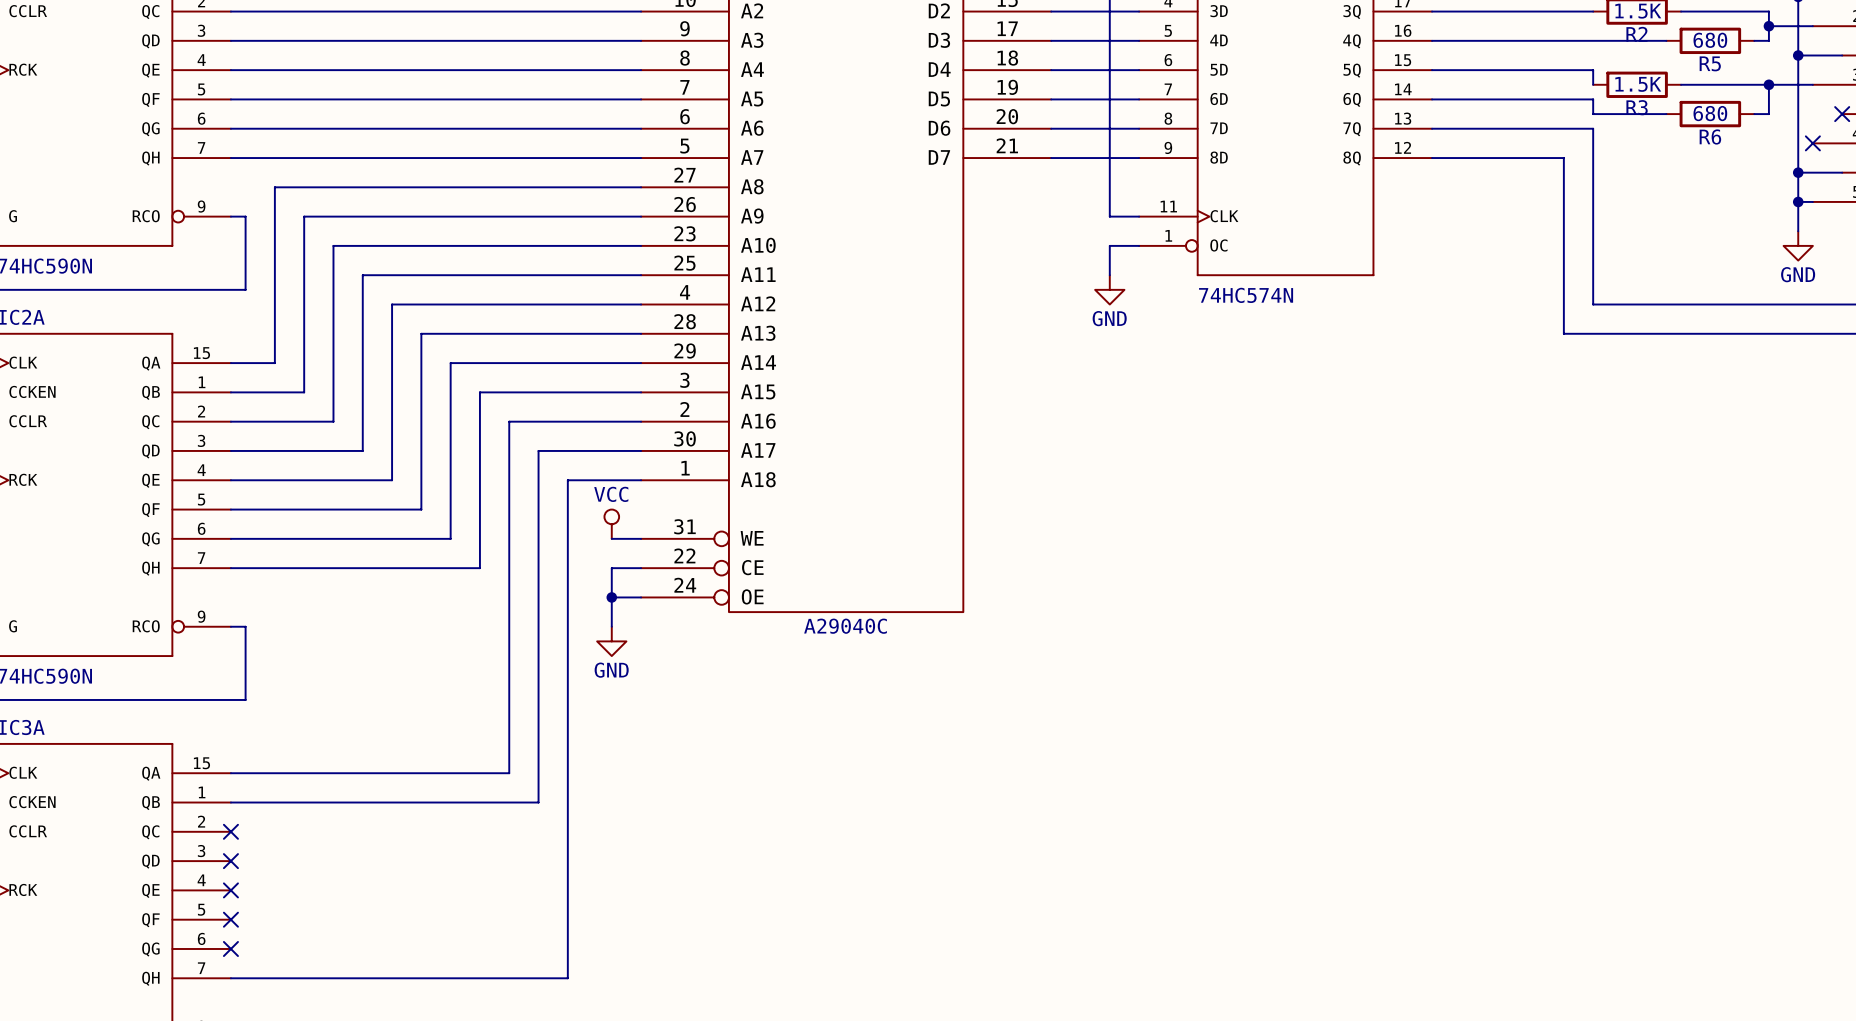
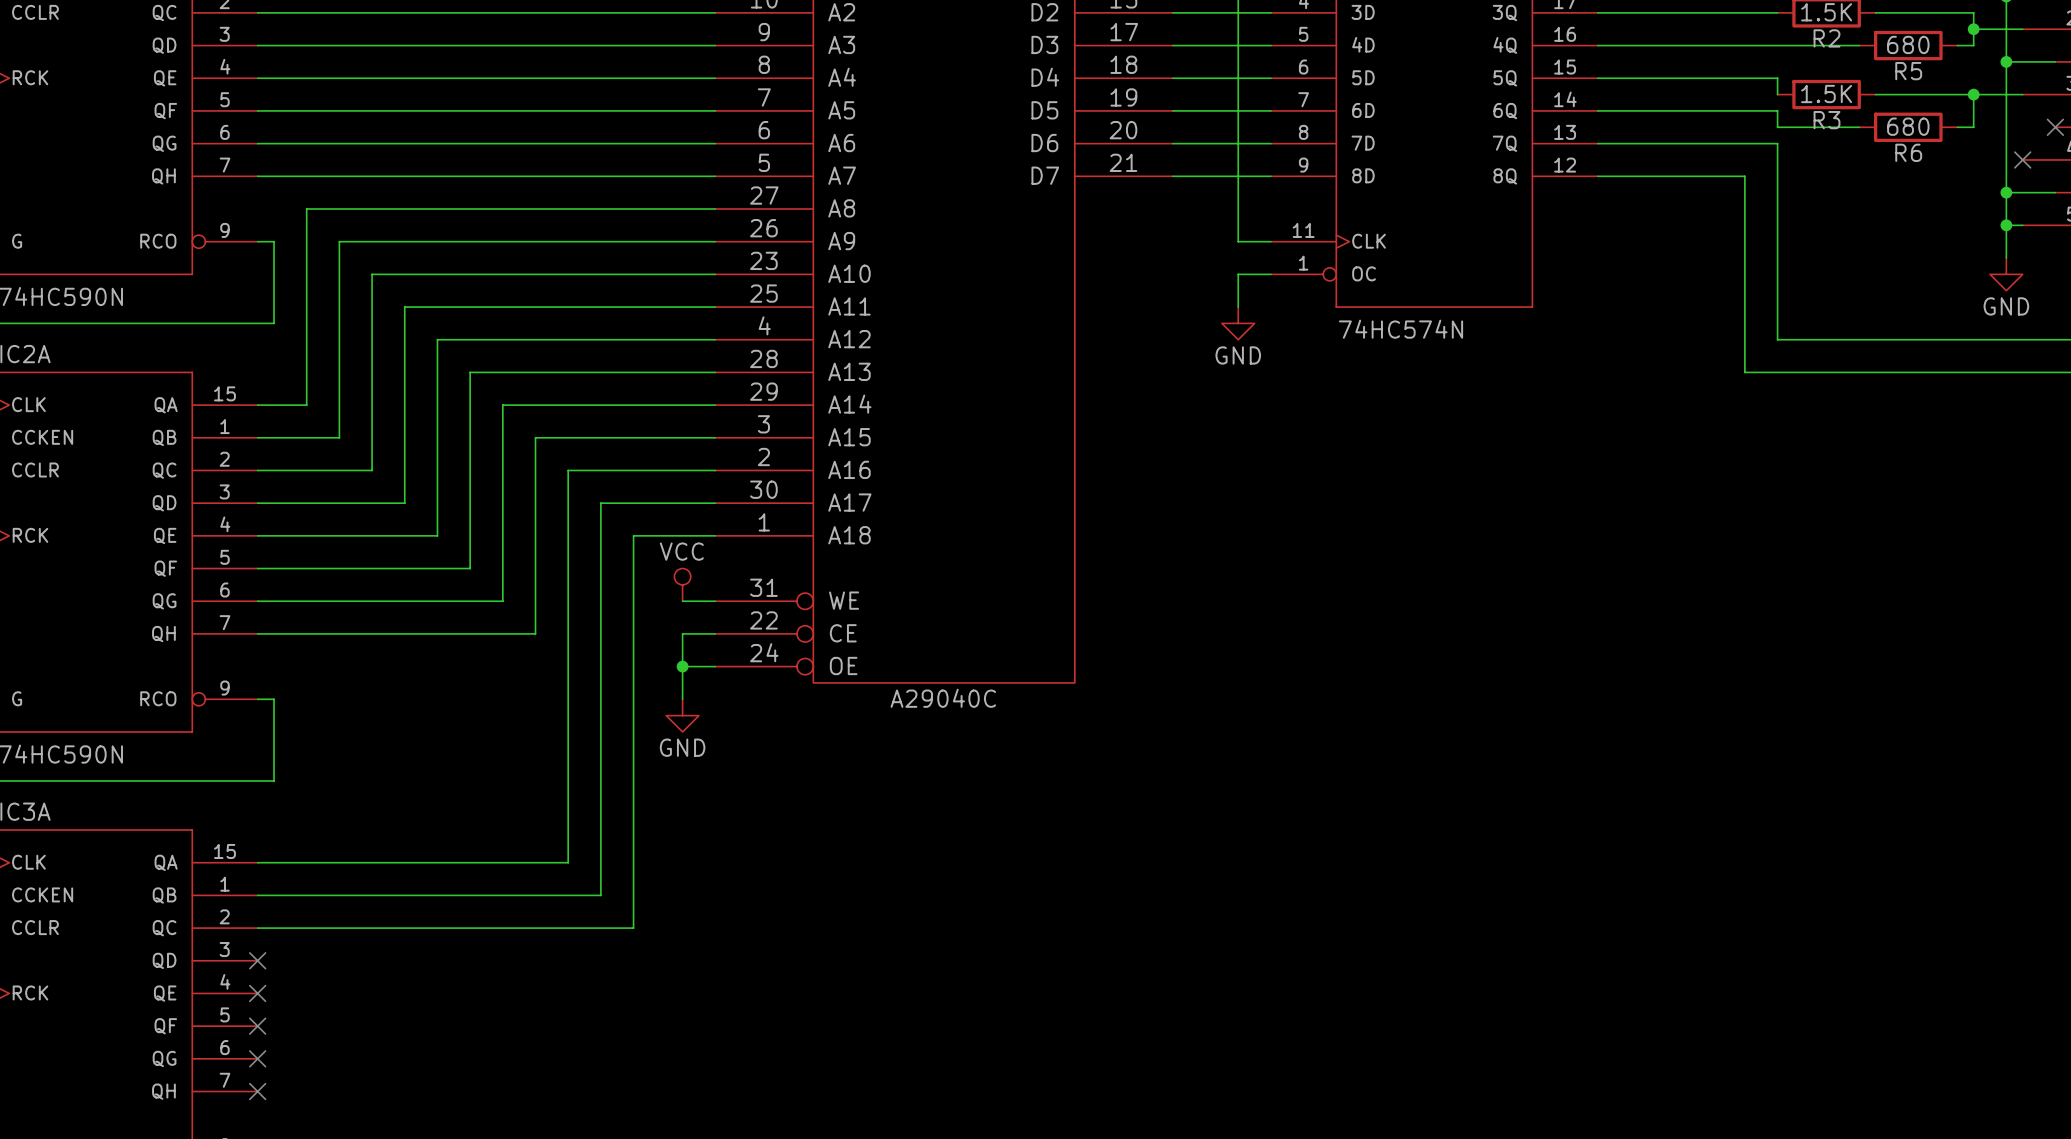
no-connect mark: (230, 831) -> none
wire: (567, 831) (567, 978) (230, 978) -> (633, 928) (257, 928)
no-connect mark: none -> (257, 1091)

